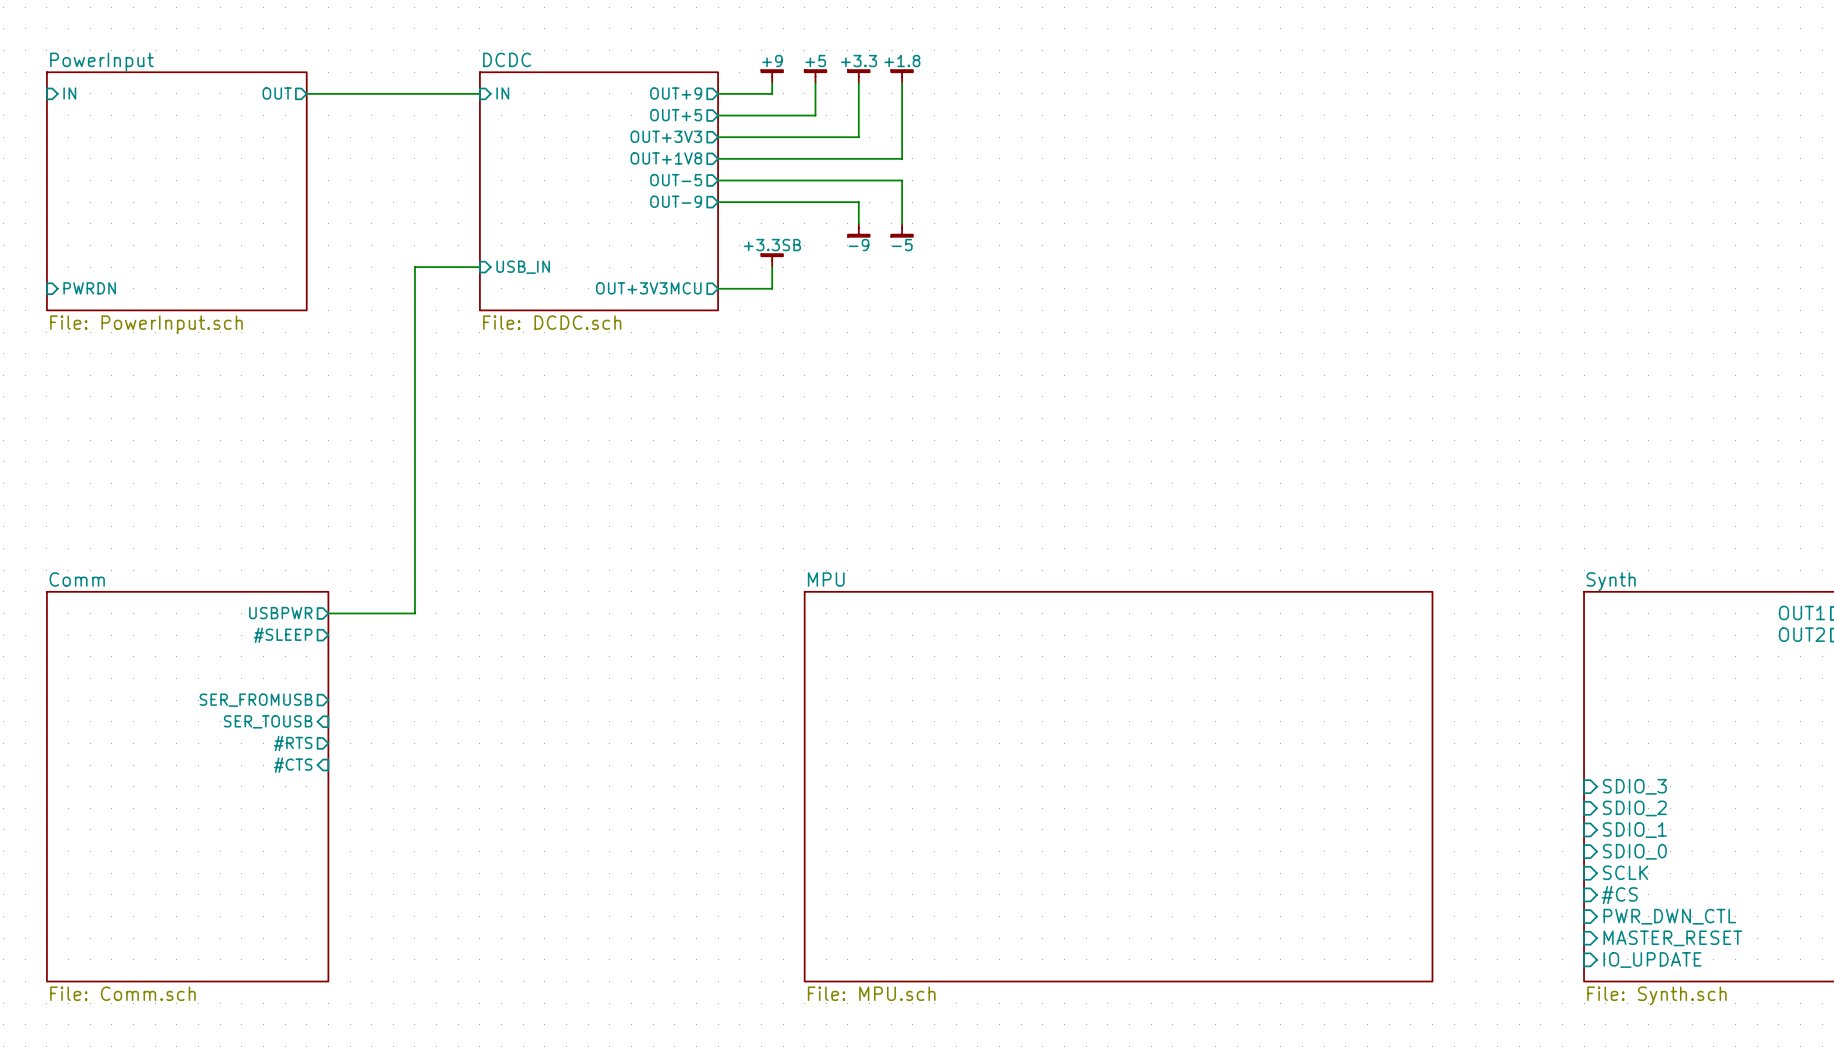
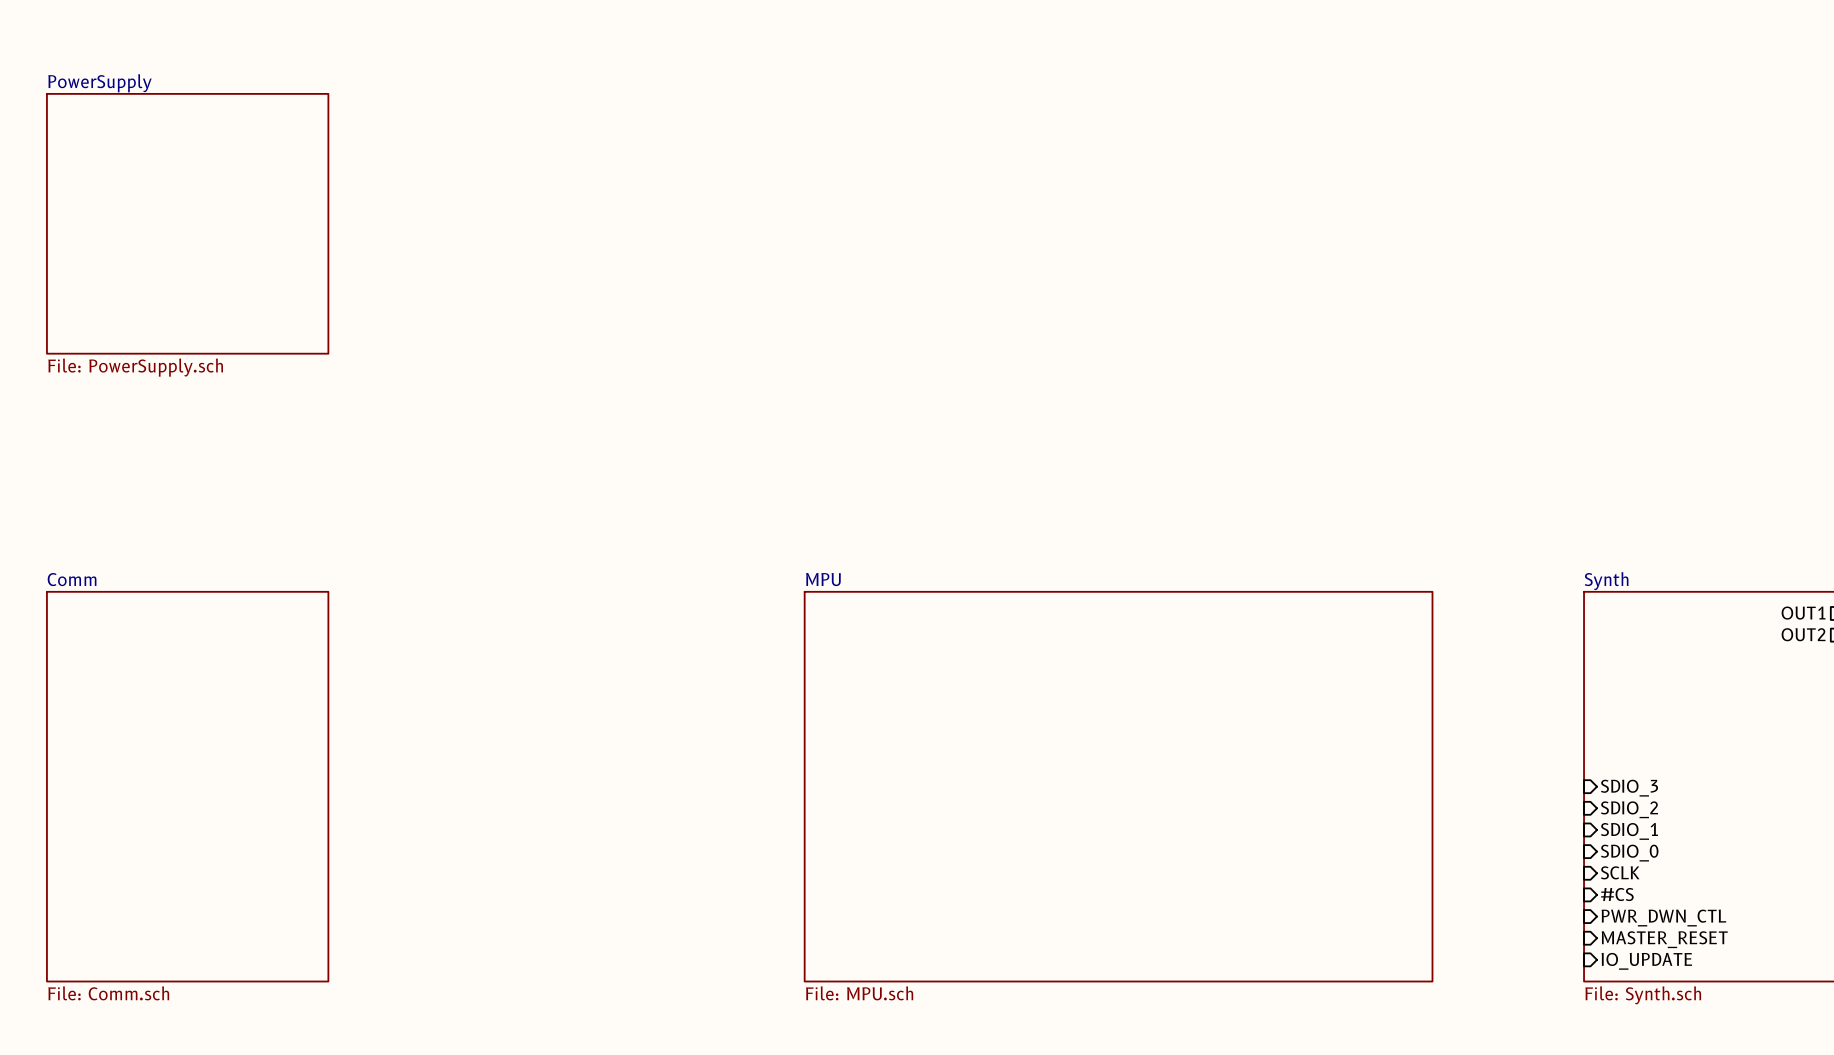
power symbol: +9 (772, 76) -> none
power symbol: +5 (815, 76) -> none
power symbol: +3.3 (858, 76) -> none
power symbol: +1.8 (902, 76) -> none
wire: (772, 83) (772, 93) (718, 93) -> none
wire: (815, 83) (815, 115) (718, 115) -> none
wire: (858, 83) (858, 137) (718, 137) -> none
wire: (902, 83) (902, 158) (718, 158) -> none
sheet pin: IN (69, 93) -> none
sheet pin: OUT (277, 93) -> none
wire: (306, 93) (479, 93) -> none
sheet pin: IN (502, 93) -> none
sheet pin: OUT+9 (676, 93) -> none
sheet pin: OUT+5 (676, 115) -> none
sheet pin: OUT+3V3 (666, 136) -> none
sheet pin: OUT+1V8 (666, 158) -> none
sheet pin: OUT-5 (676, 180) -> none
wire: (718, 180) (902, 180) (902, 223) -> none
sheet PowerInput: File: PowerInput.sch (176, 191) -> none
sheet DCDC: File: DCDC.sch (599, 191) -> none
sheet pin: OUT-9 (676, 201) -> none
wire: (718, 202) (858, 202) (858, 223) -> none
sheet PowerSupply: none -> File: PowerSupply.sch (187, 223)
power symbol: -9 (858, 230) -> none
power symbol: -5 (902, 230) -> none
power symbol: +3.3SB (772, 260) -> none
wire: (479, 267) (414, 267) (414, 613) (328, 613) -> none
sheet pin: USB_IN (523, 267) -> none
wire: (772, 267) (772, 288) (718, 288) -> none
sheet pin: PWRDN (89, 288) -> none
sheet pin: OUT+3V3MCU (648, 288) -> none
sheet pin: USBPWR (280, 613) -> none
sheet pin: #SLEEP (283, 635) -> none
sheet pin: SER_FROMUSB (256, 700) -> none
sheet pin: SER_TOUSB (268, 721) -> none
sheet pin: #RTS (293, 743) -> none
sheet pin: #CTS (293, 765) -> none

